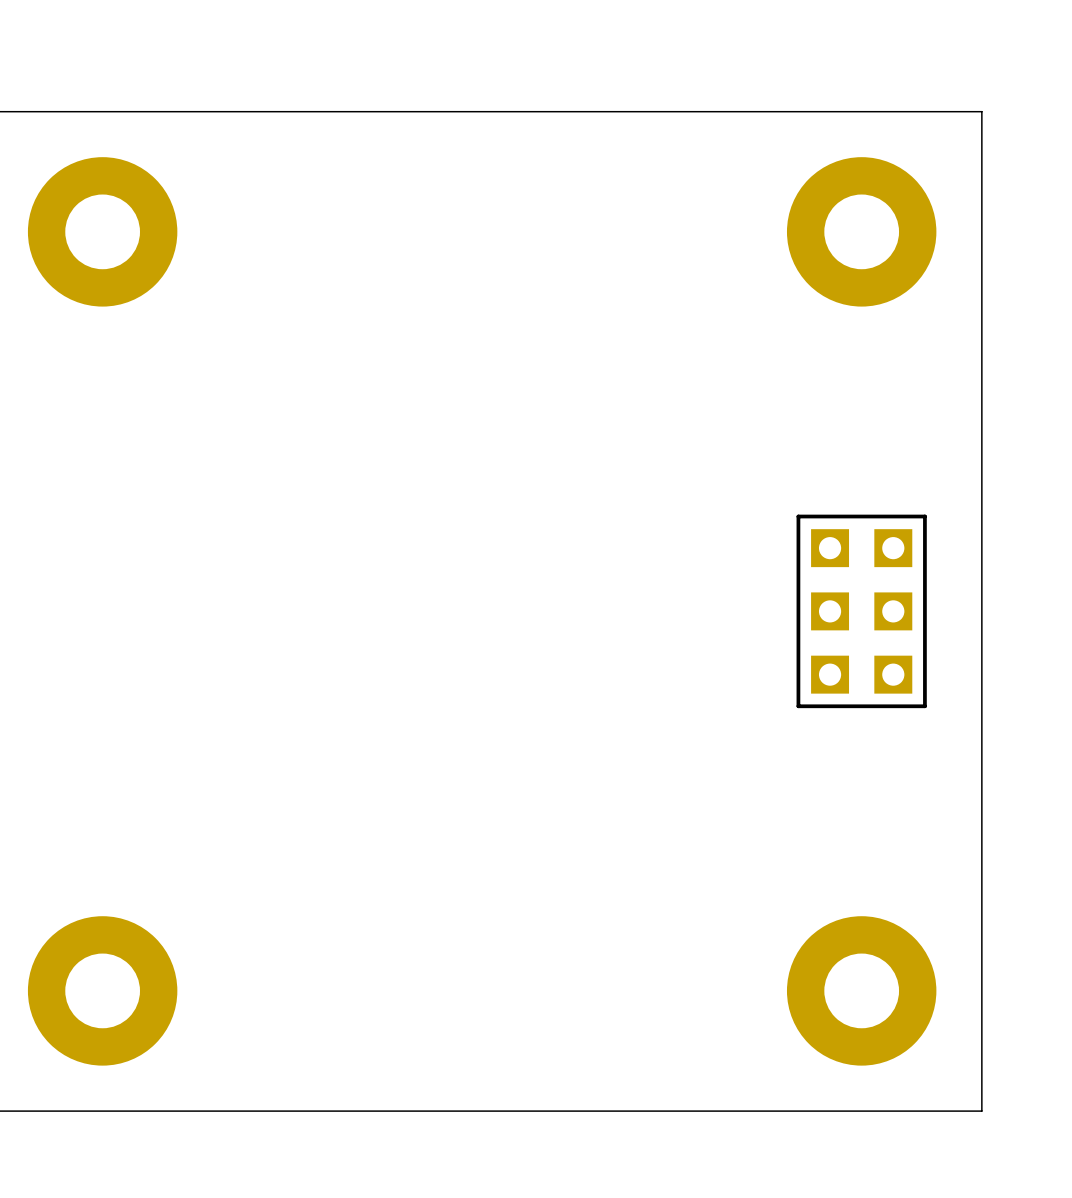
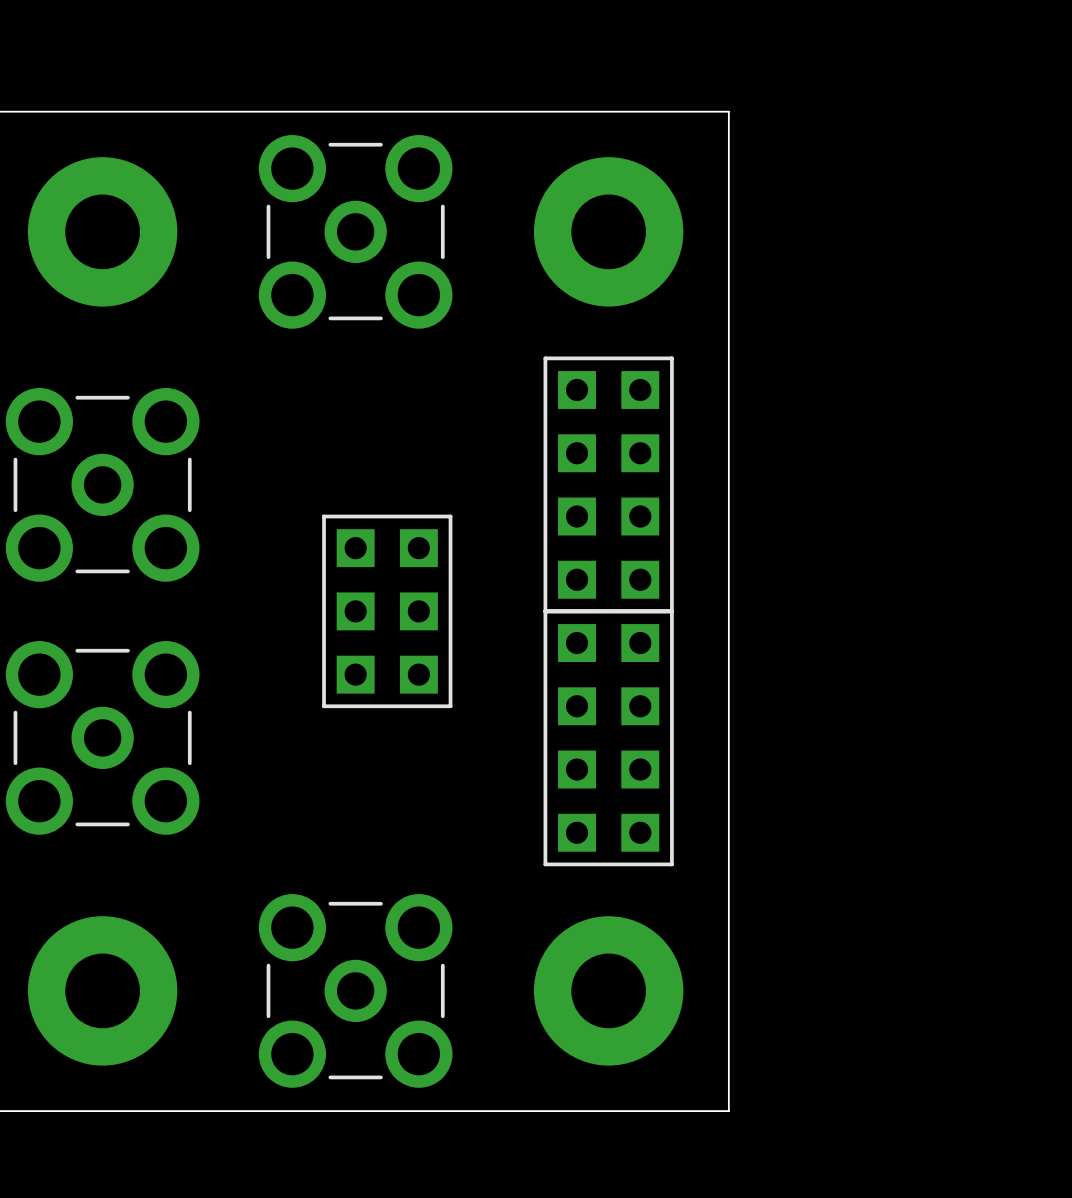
board edge: (728, 111) (981, 111) (981, 1111) (728, 1111) -> (728, 111) (728, 1111)
part: none -> (355, 231)
part position: (861, 231) -> (608, 231)
part: none -> (102, 484)
part: none -> (608, 484)
part position: (861, 611) -> (387, 611)
part: none -> (102, 737)
part: none -> (608, 737)
part: none -> (355, 990)
part position: (861, 990) -> (608, 990)

